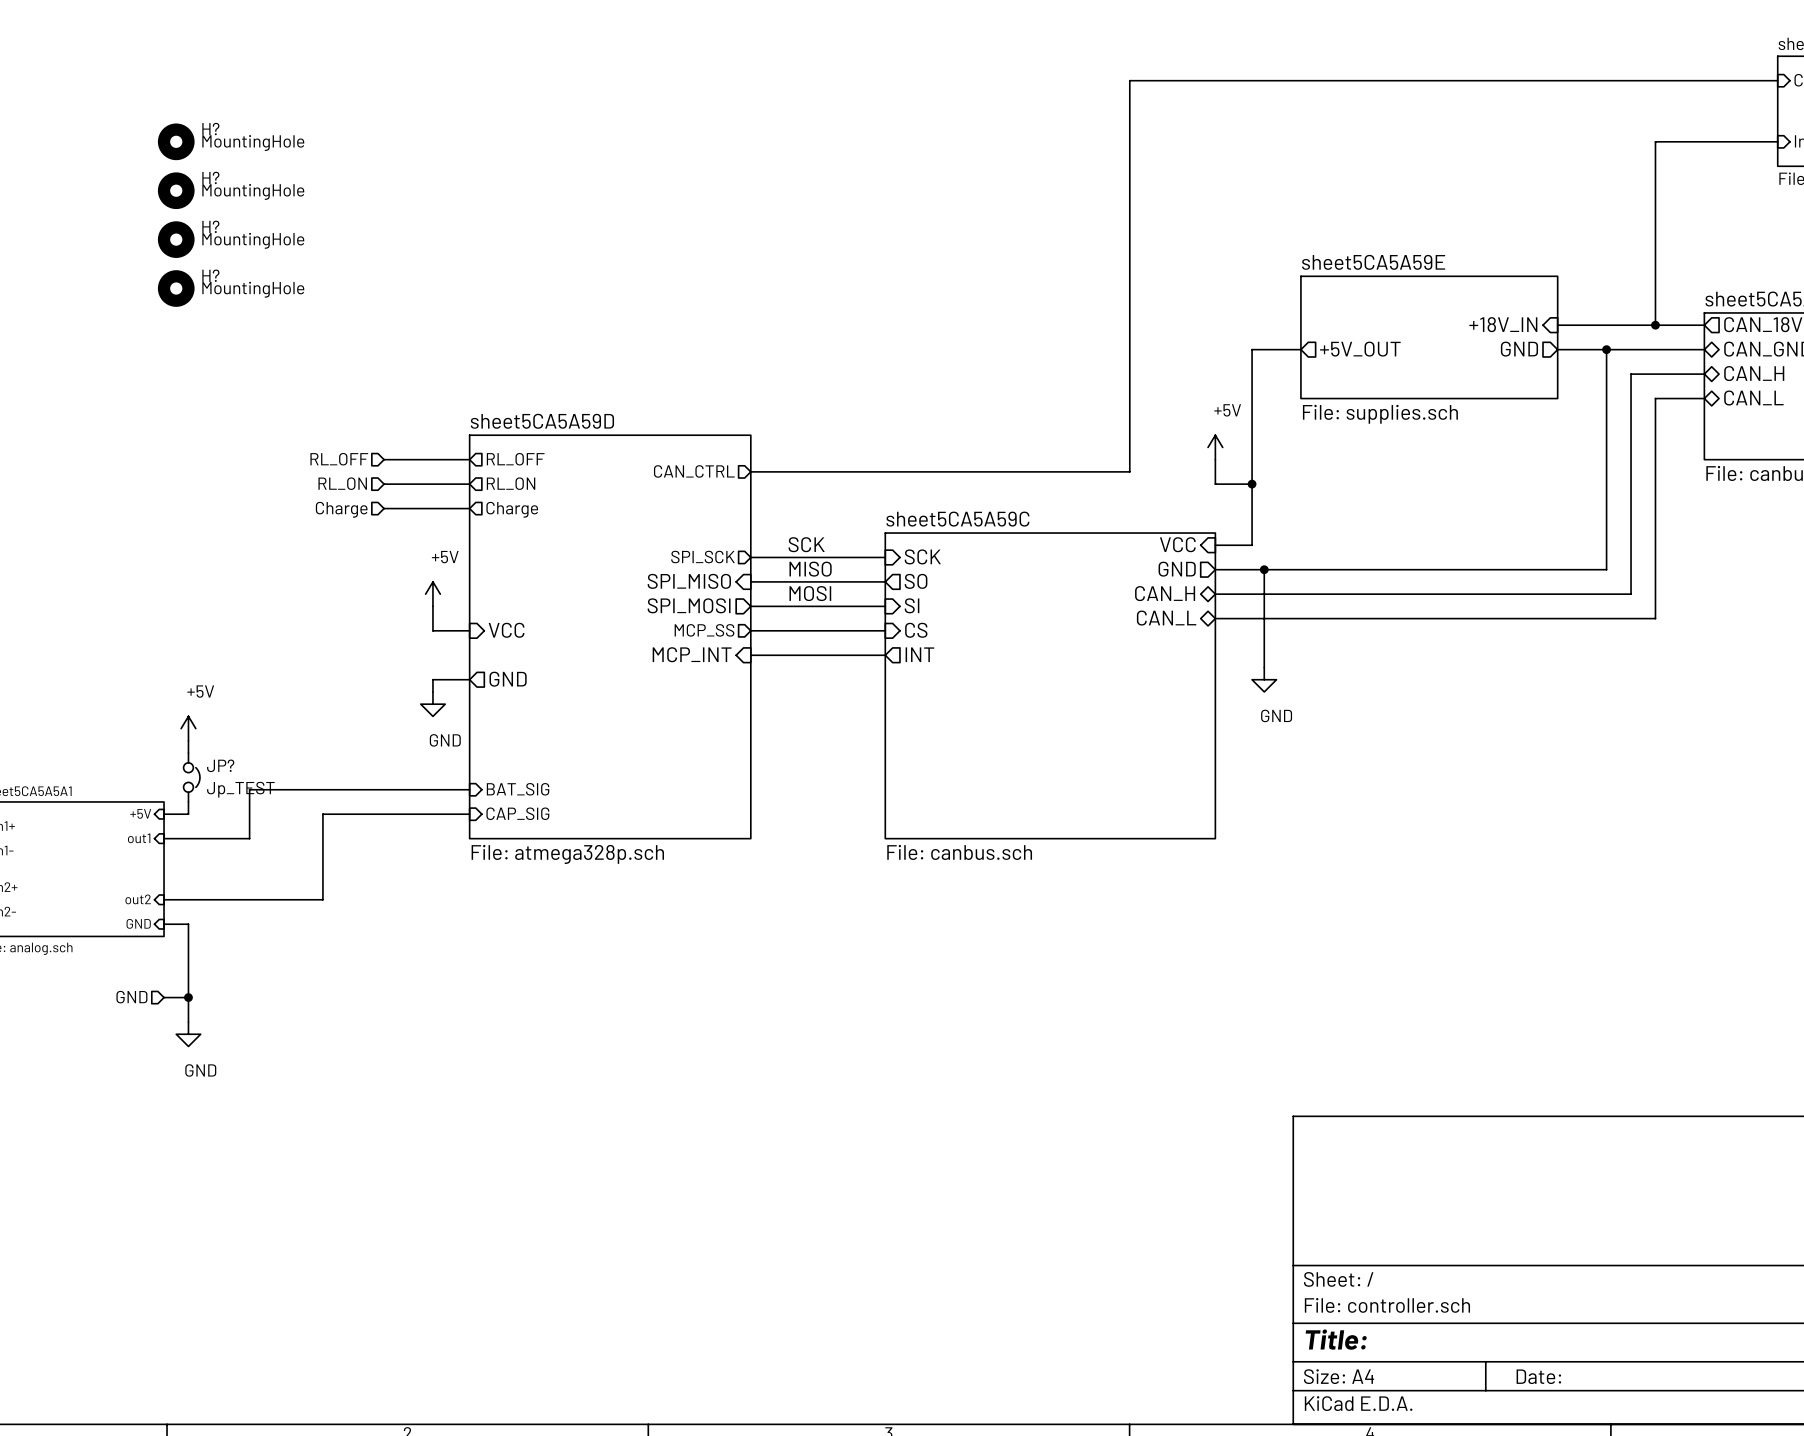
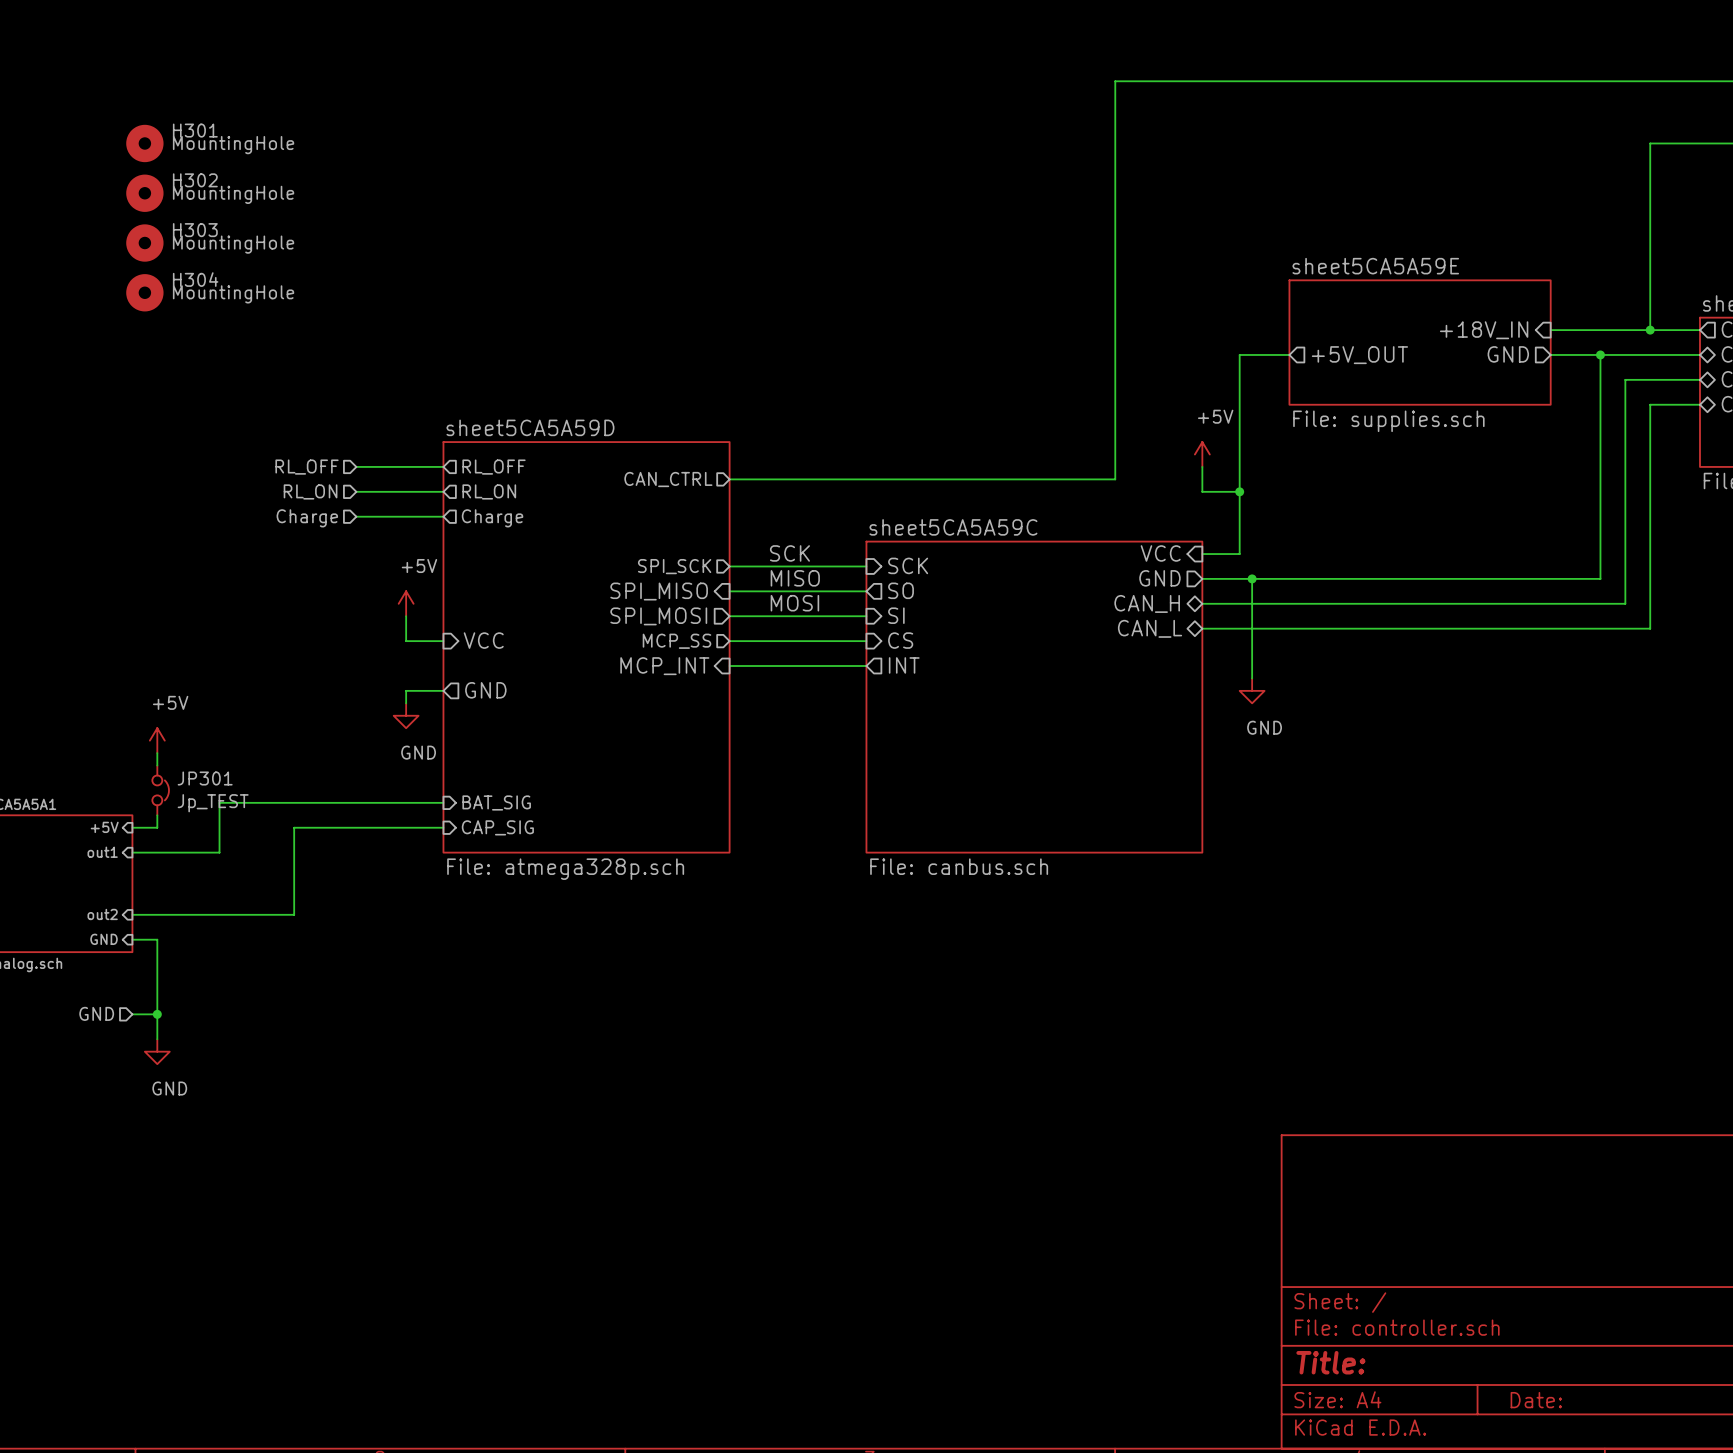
H? name: H? (210, 129) -> H301 (195, 130)
H? name: H? (210, 177) -> H302 (195, 180)
H? name: H? (210, 226) -> H303 (195, 230)
H? name: H? (210, 275) -> H304 (195, 279)
JP? name: JP? (220, 765) -> JP301 (205, 778)

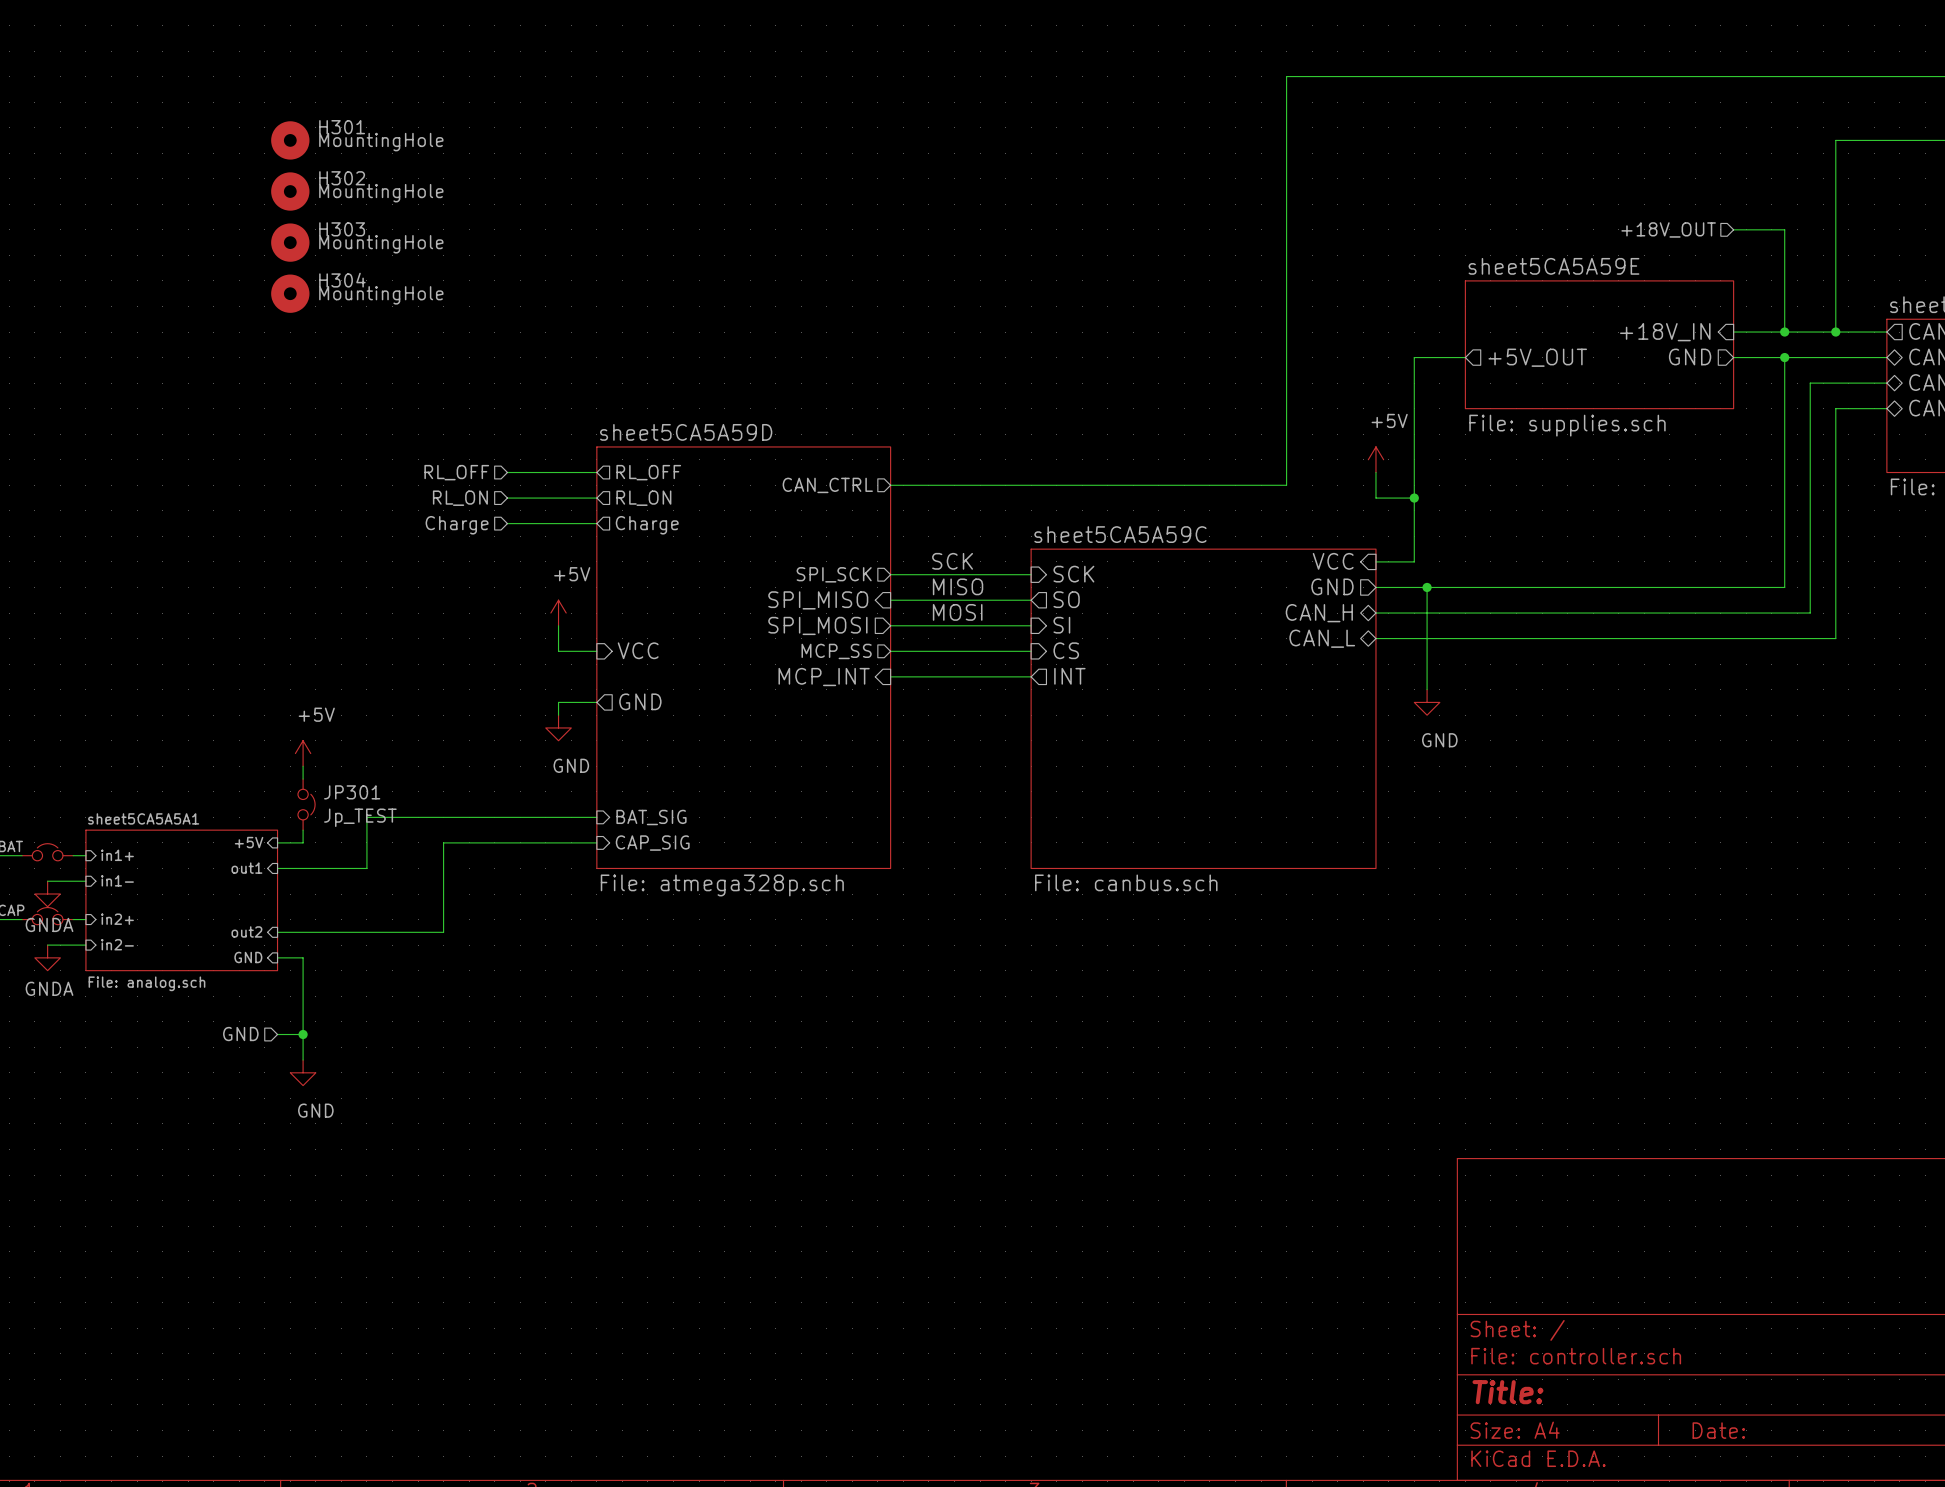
hierarchical label: none -> +18V_OUT (1668, 229)
wire: none -> (1733, 229) (1784, 229) (1784, 332)
junction: none -> (1784, 332)

